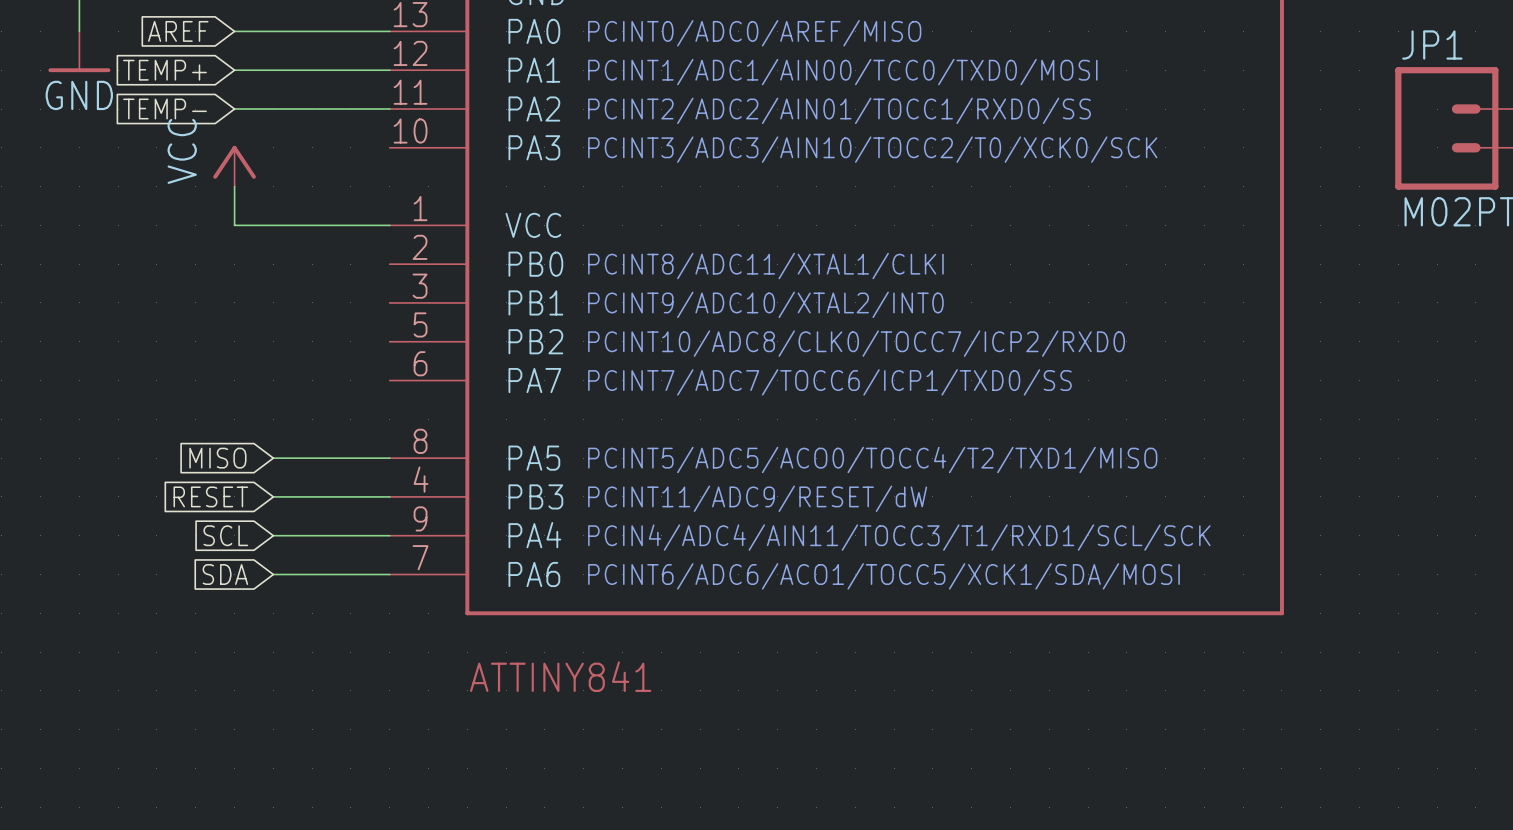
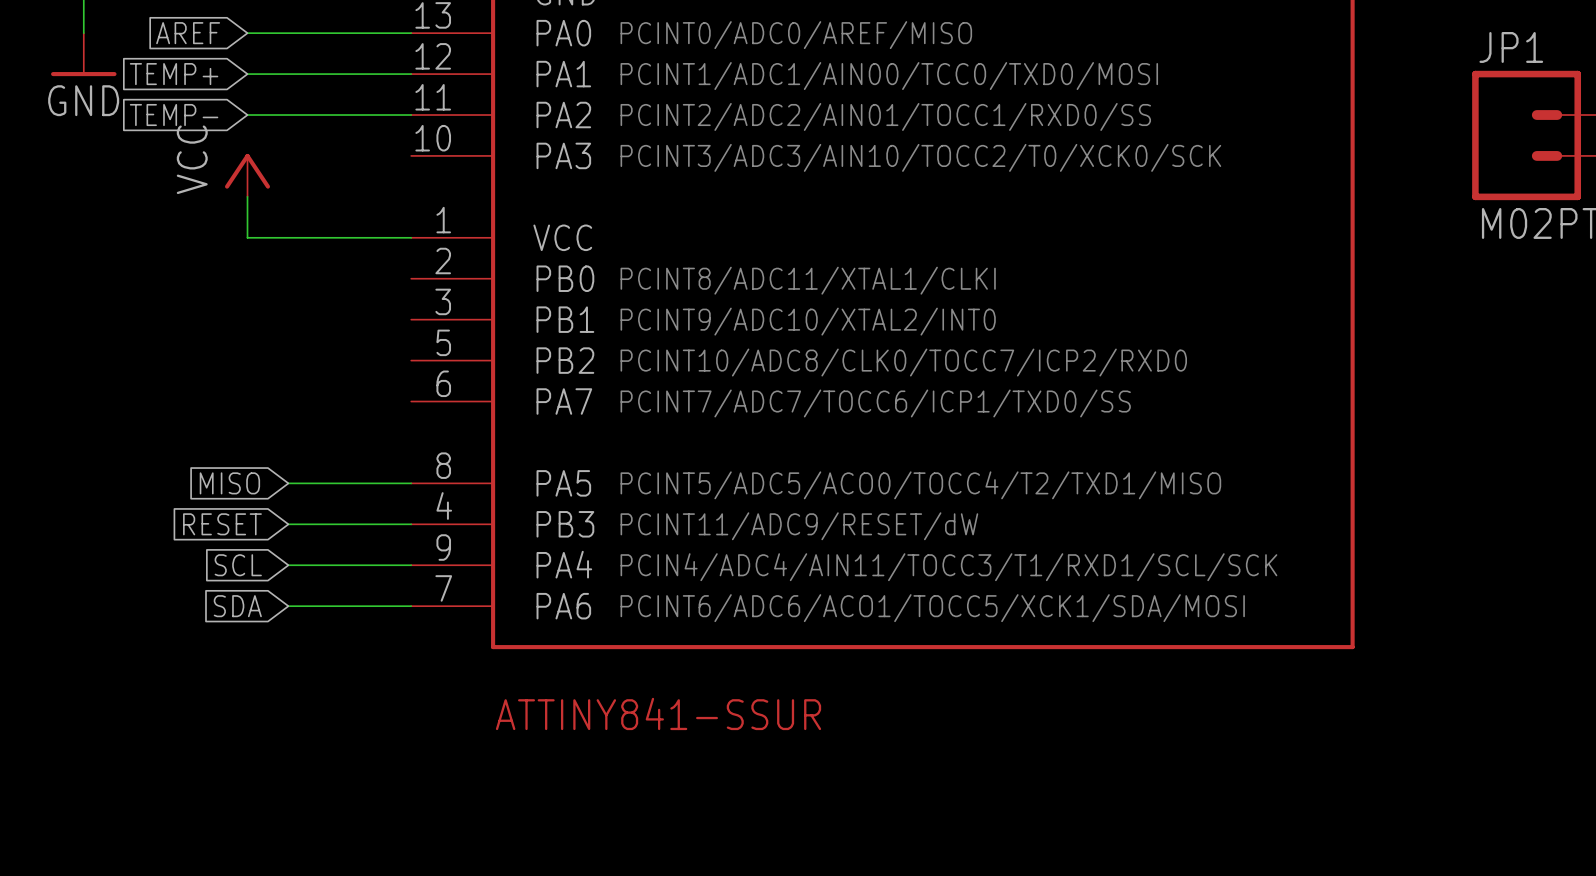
part value: ATTINY841 (560, 676) -> ATTINY841-SSUR (658, 713)

